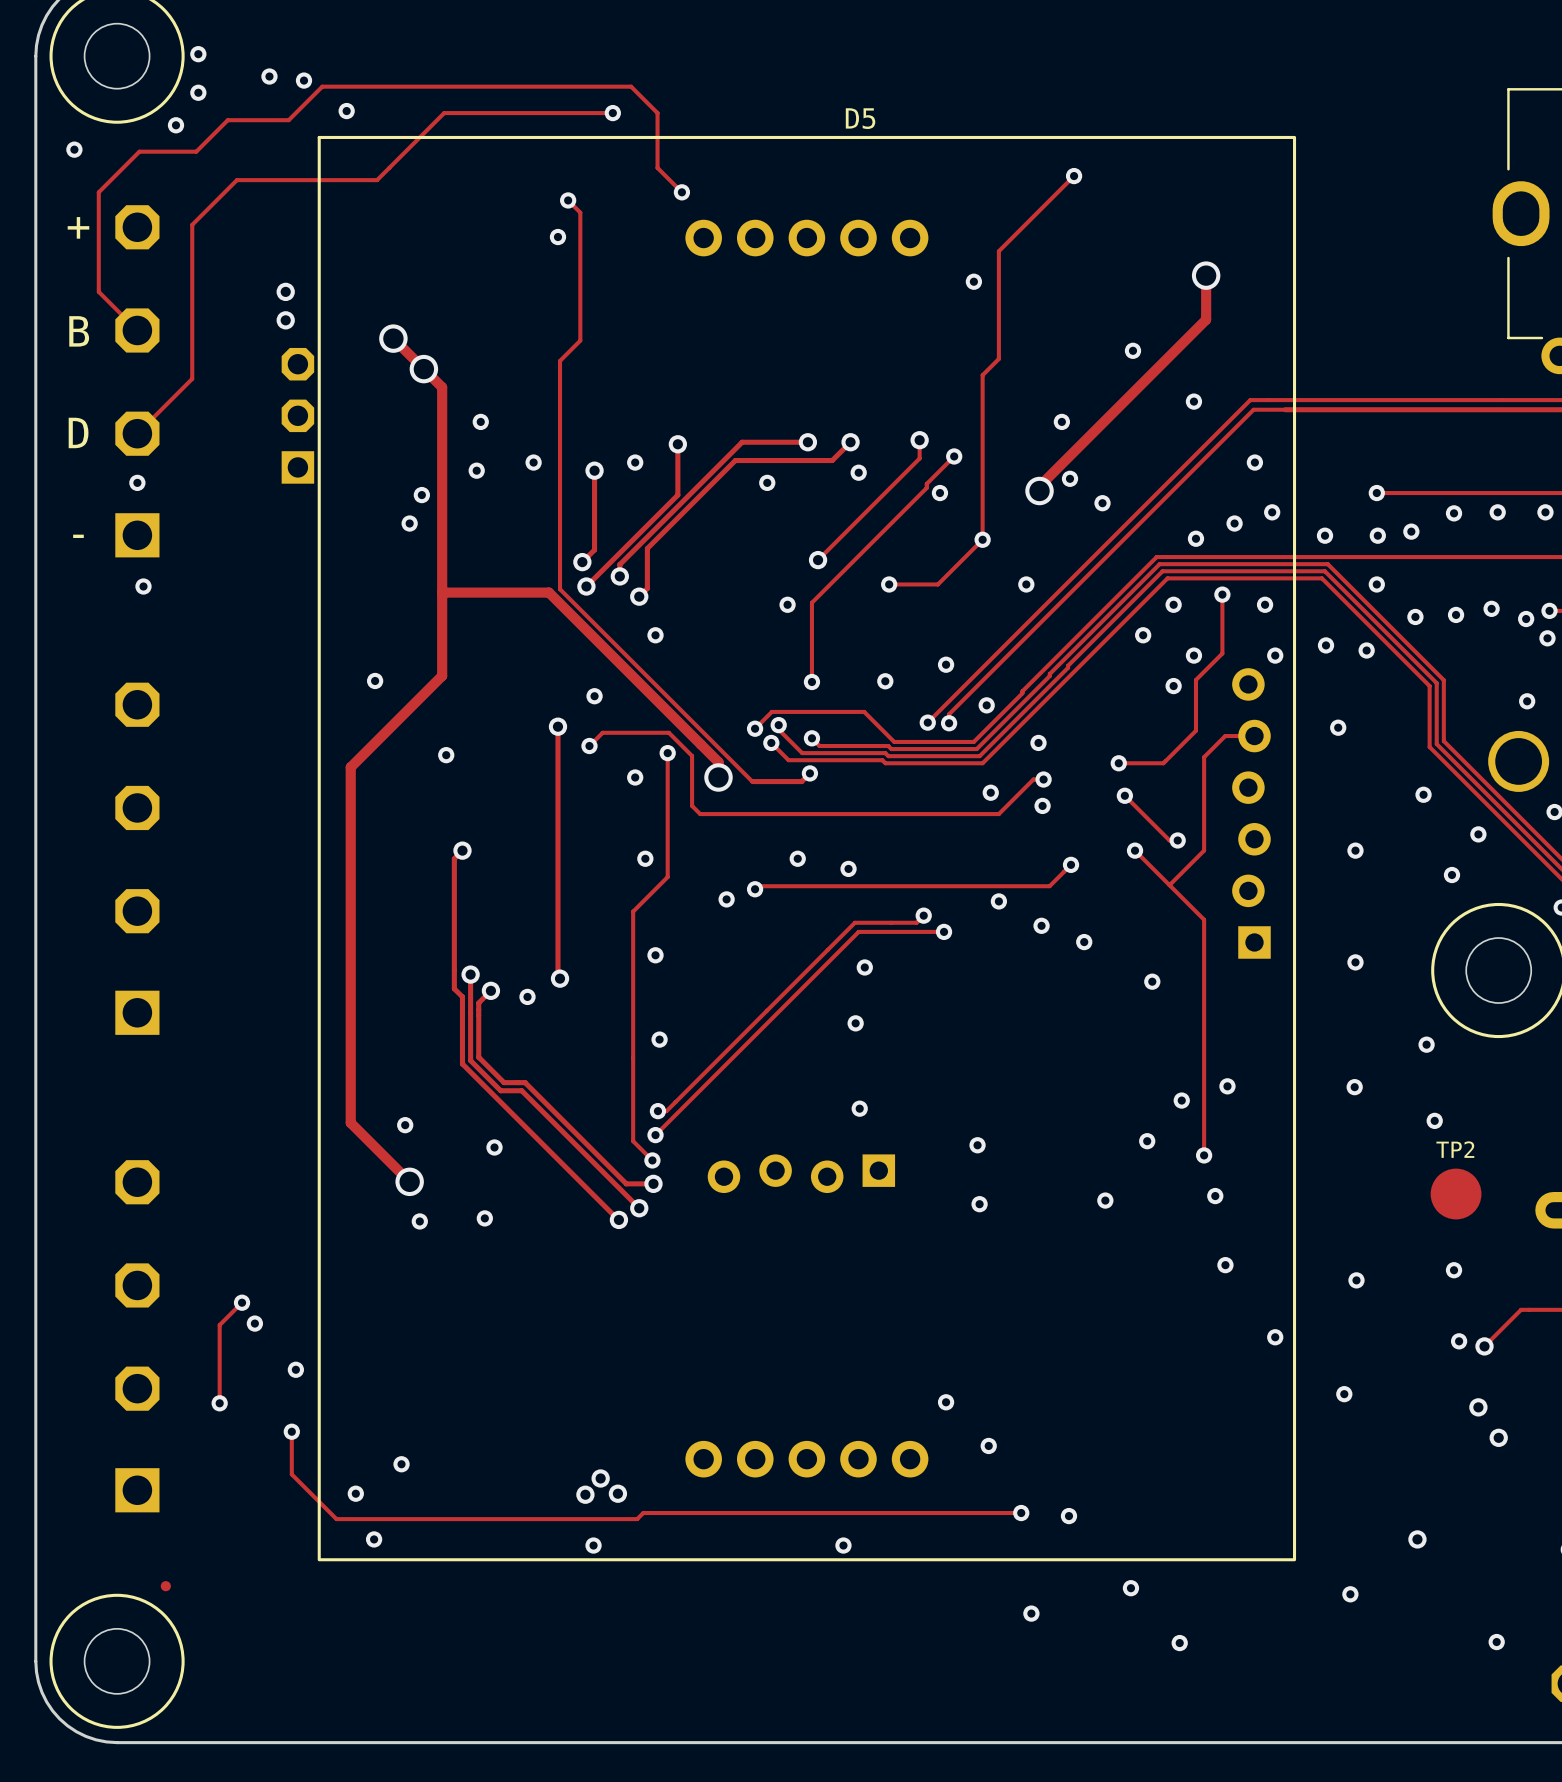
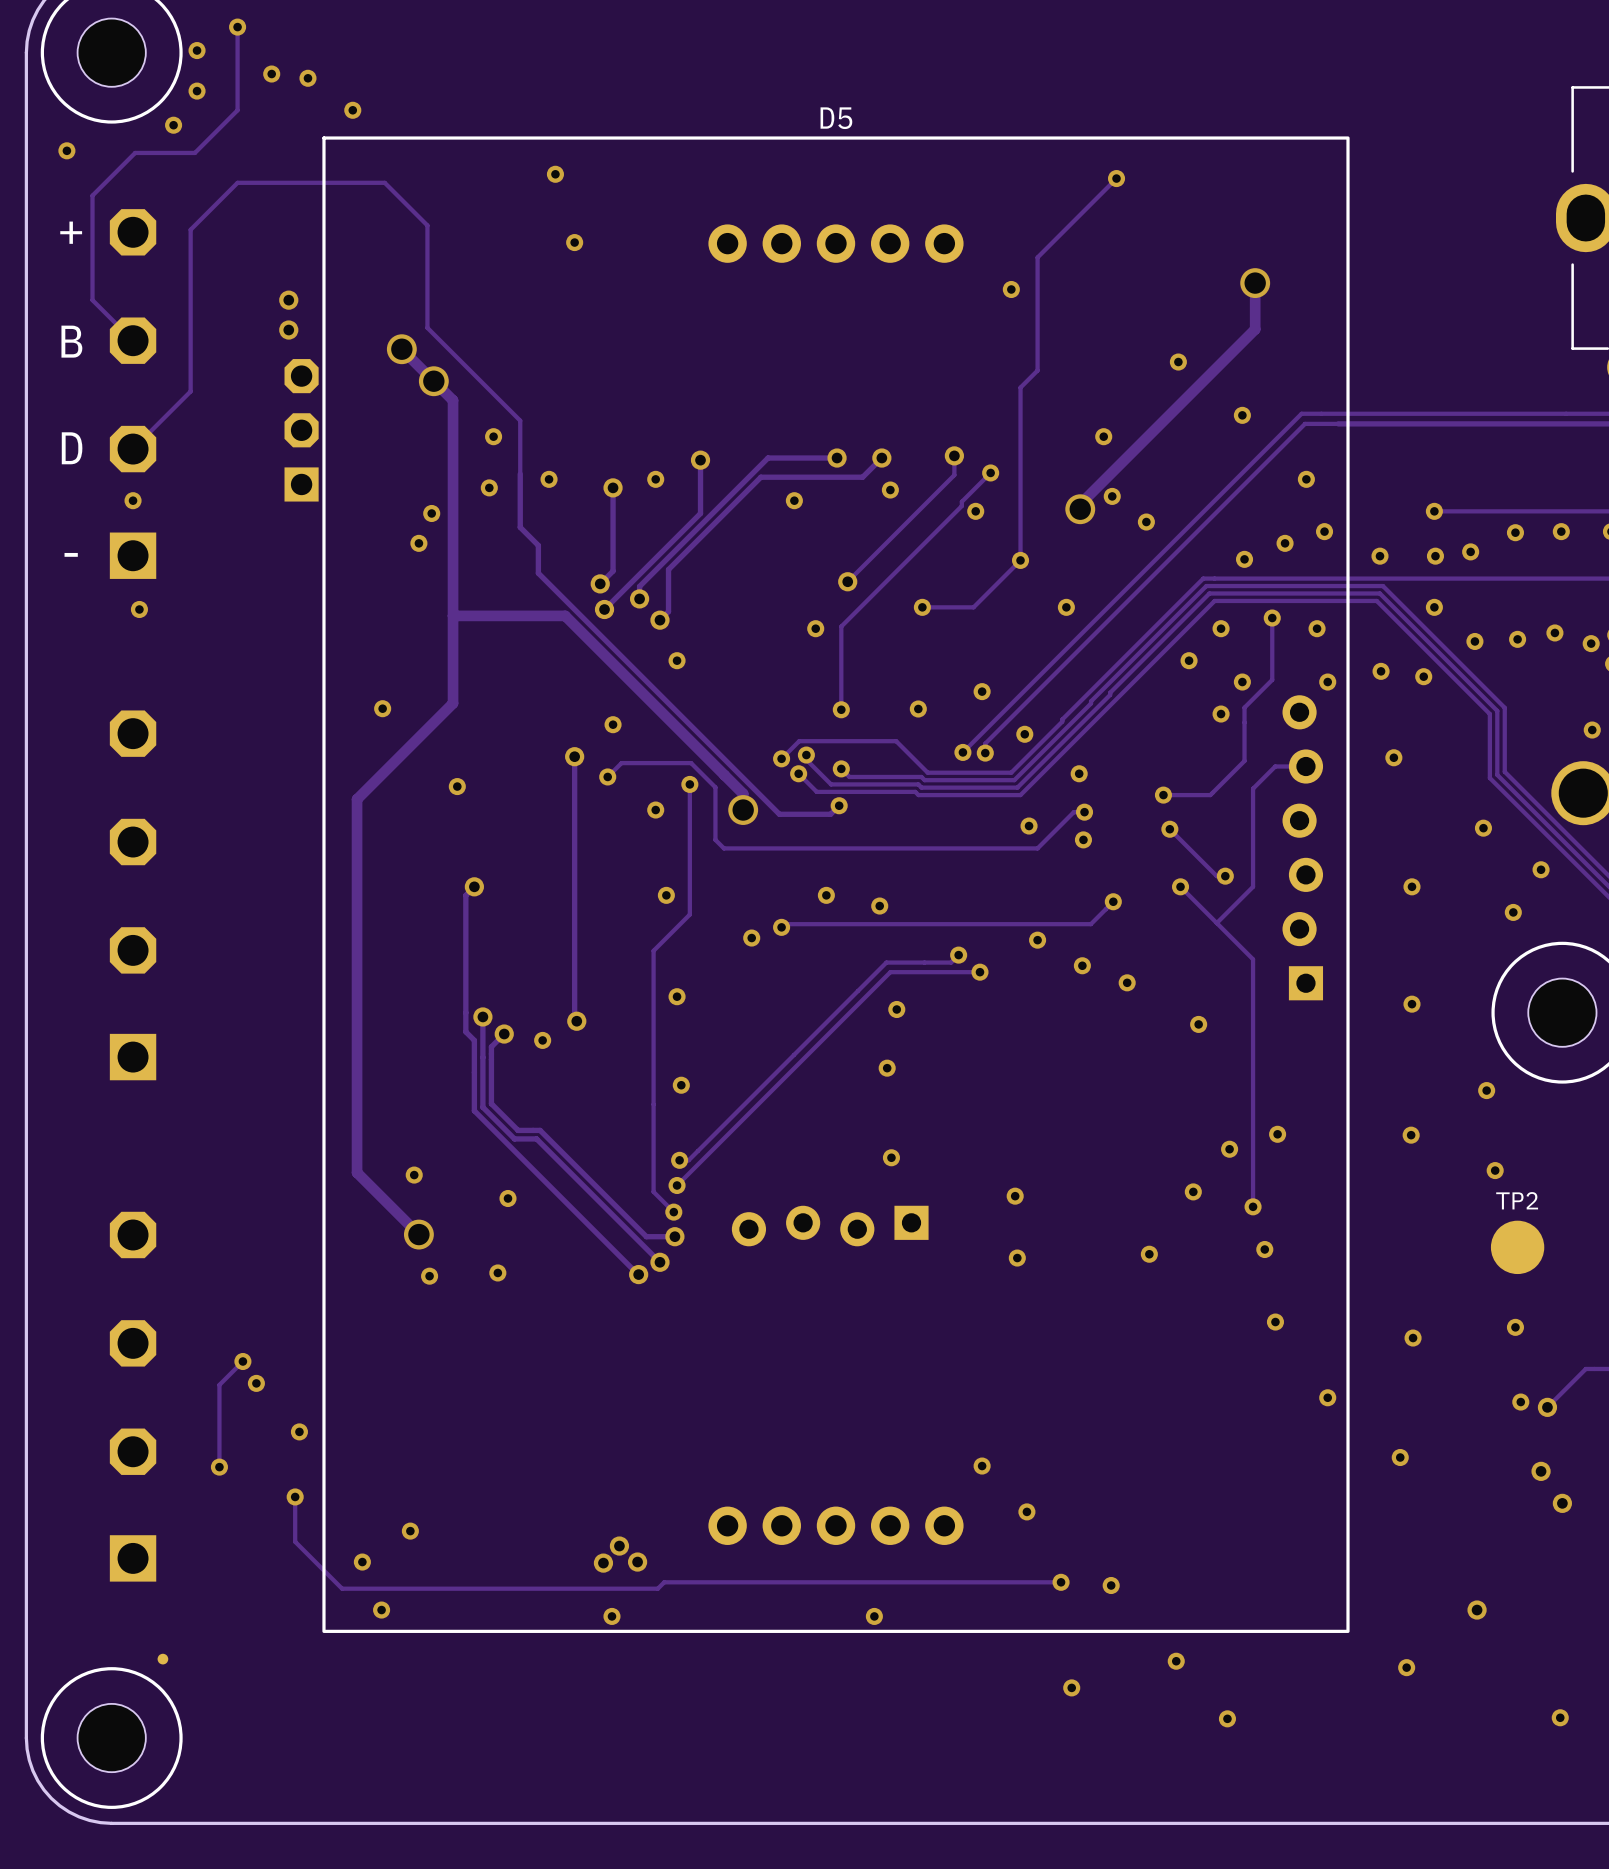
via: none -> (237, 27)
track: (612, 113) (444, 113) (377, 180) -> none
via: (612, 113) -> none
D5 name position: D5 (860, 118) -> D5 (836, 118)
track: (227, 120) (288, 120) (322, 86) (631, 86) (657, 113) (657, 167) (681, 192) -> (227, 119) (237, 110) (237, 27)
via: (681, 192) -> none
track: (568, 200) (580, 212) (580, 340) (560, 360) (560, 589) (753, 781) -> (384, 182) (427, 225) (427, 327) (520, 420) (520, 527) (538, 545) (538, 573) (779, 814)
via position: (568, 200) -> (555, 174)

